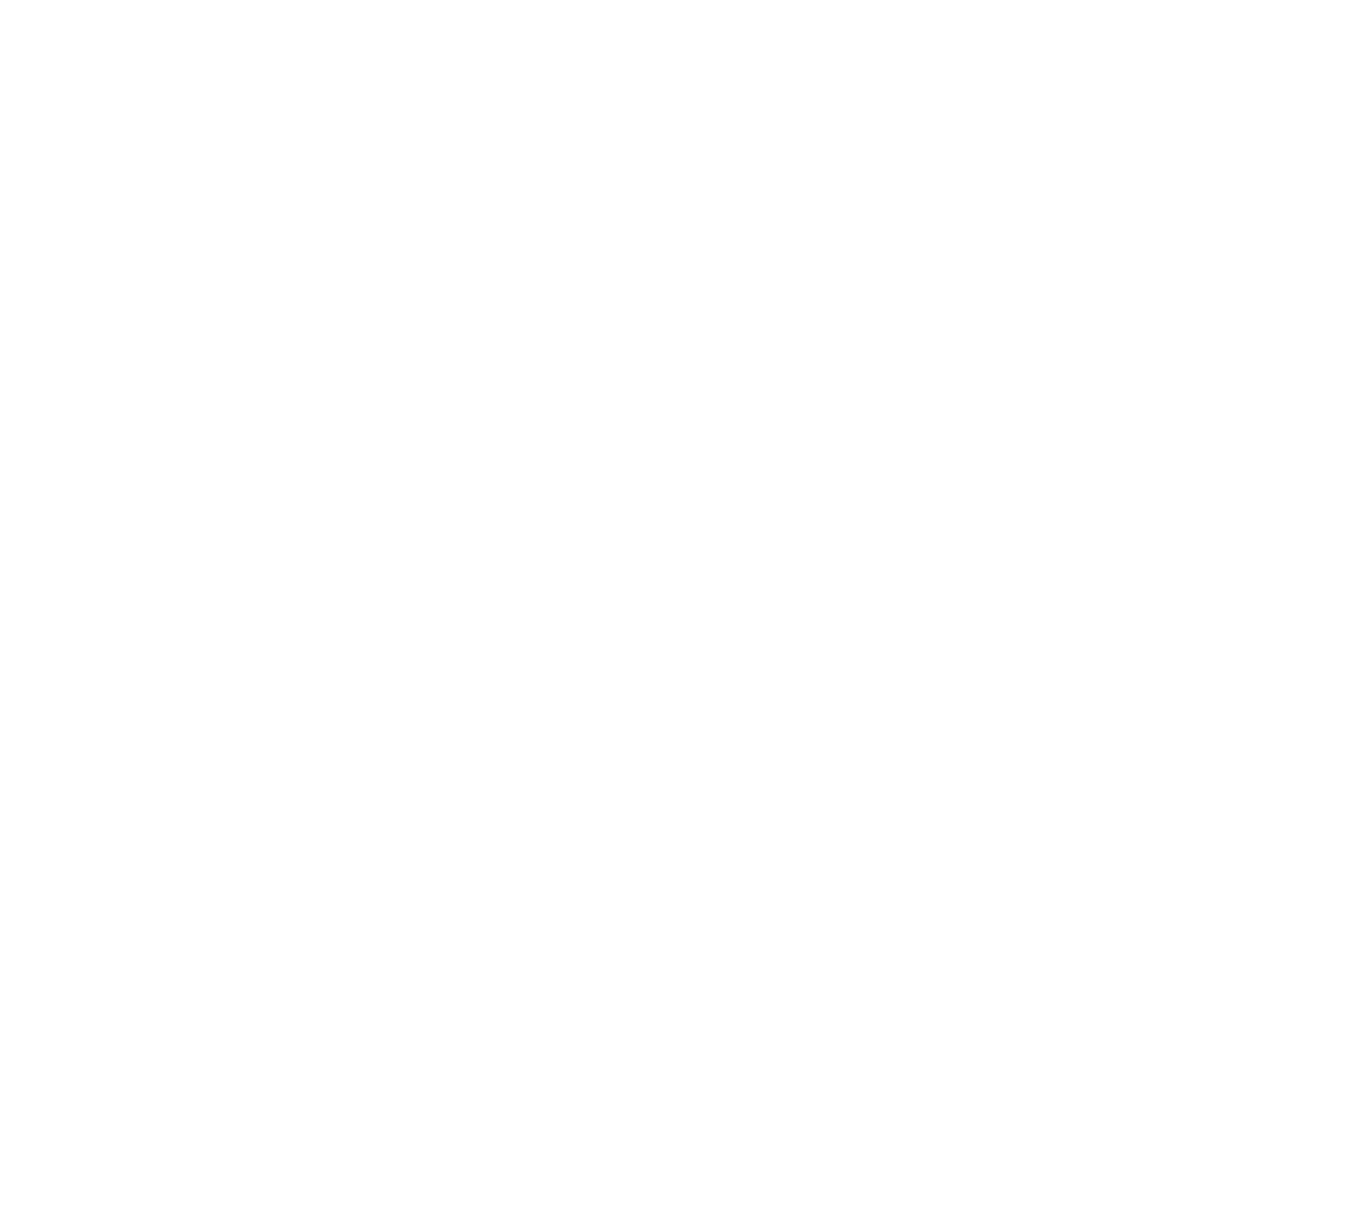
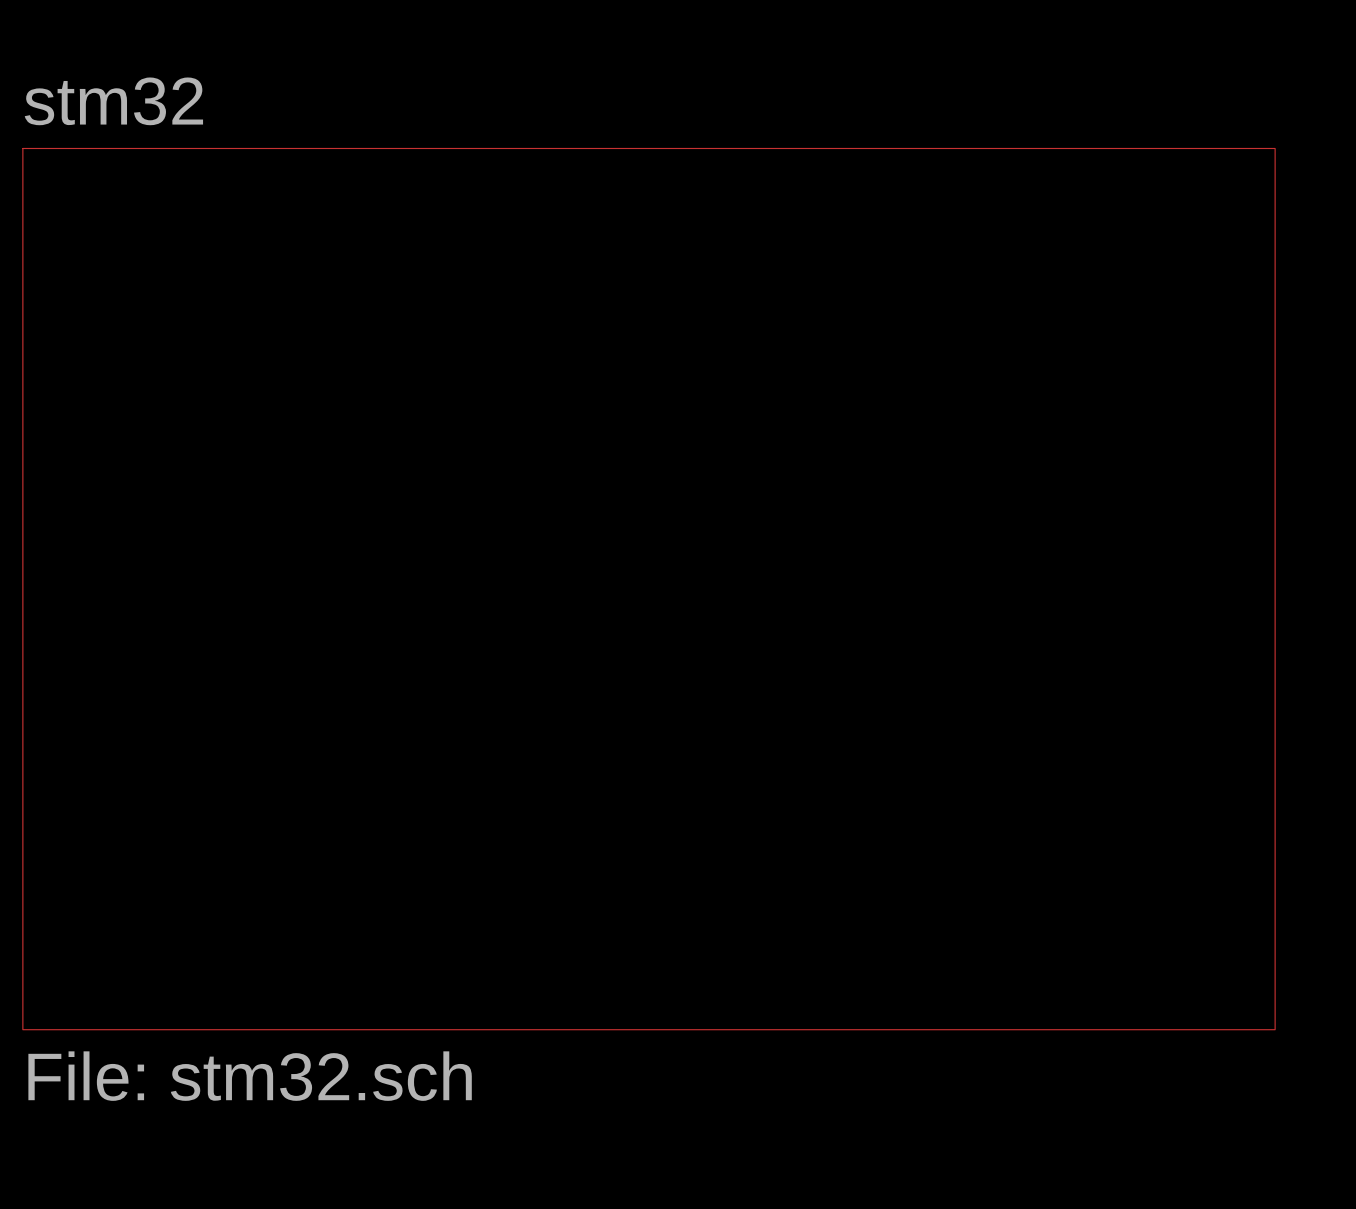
sheet stm32: none -> File: stm32.sch (648, 589)

